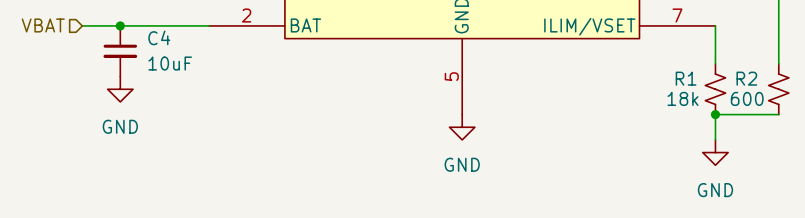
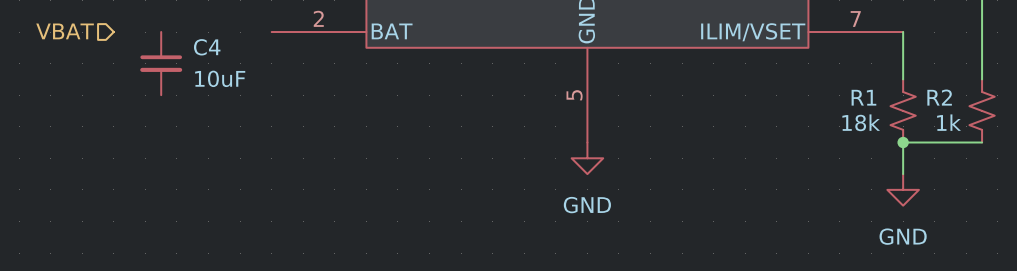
wire: (82, 25) (208, 25) -> none
junction: (120, 25) -> none
power symbol: GND (120, 89) -> none
R2 value: 600 (747, 98) -> 1k (949, 122)

